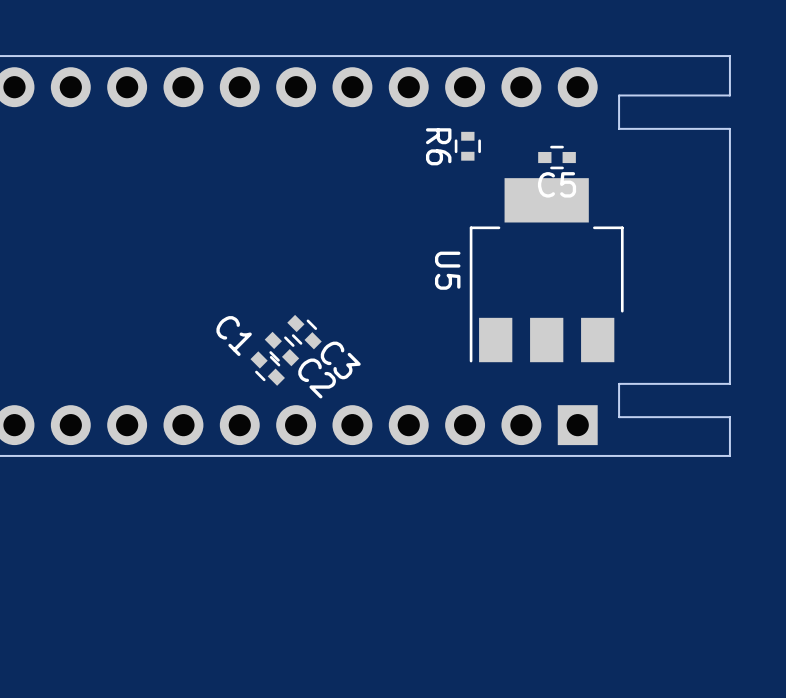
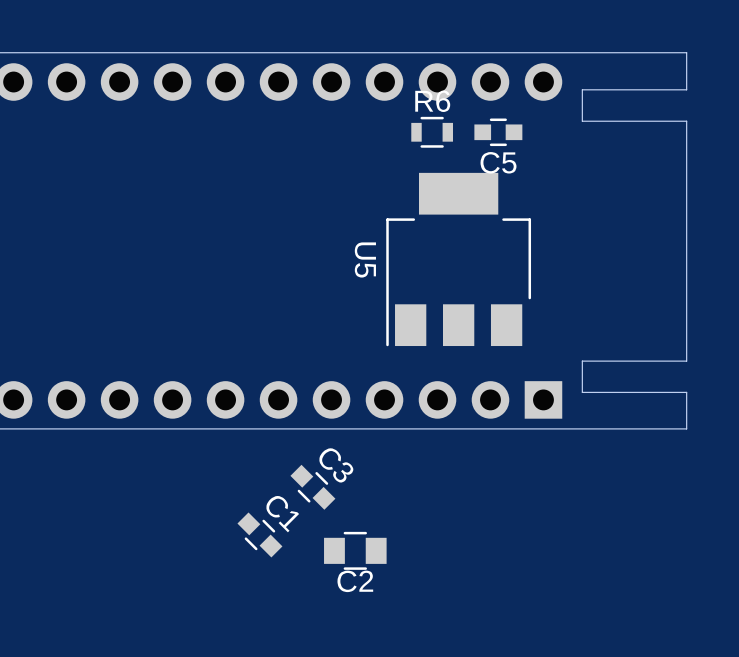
R6 footprint: [454, 131, 481, 161] -> [411, 116, 454, 148]
C5 footprint: [538, 145, 576, 170] -> [474, 118, 523, 147]
U5 position: (546, 270) -> (458, 259)
C3 footprint: [287, 314, 322, 350] -> [290, 464, 336, 510]
C2 footprint: [264, 331, 300, 367] -> [324, 531, 387, 570]
C1 name position: C1 (234, 336) -> C1 (282, 514)
C1 footprint: [250, 351, 285, 386] -> [237, 512, 283, 558]
C3 name position: C3 (340, 360) -> C3 (336, 465)

